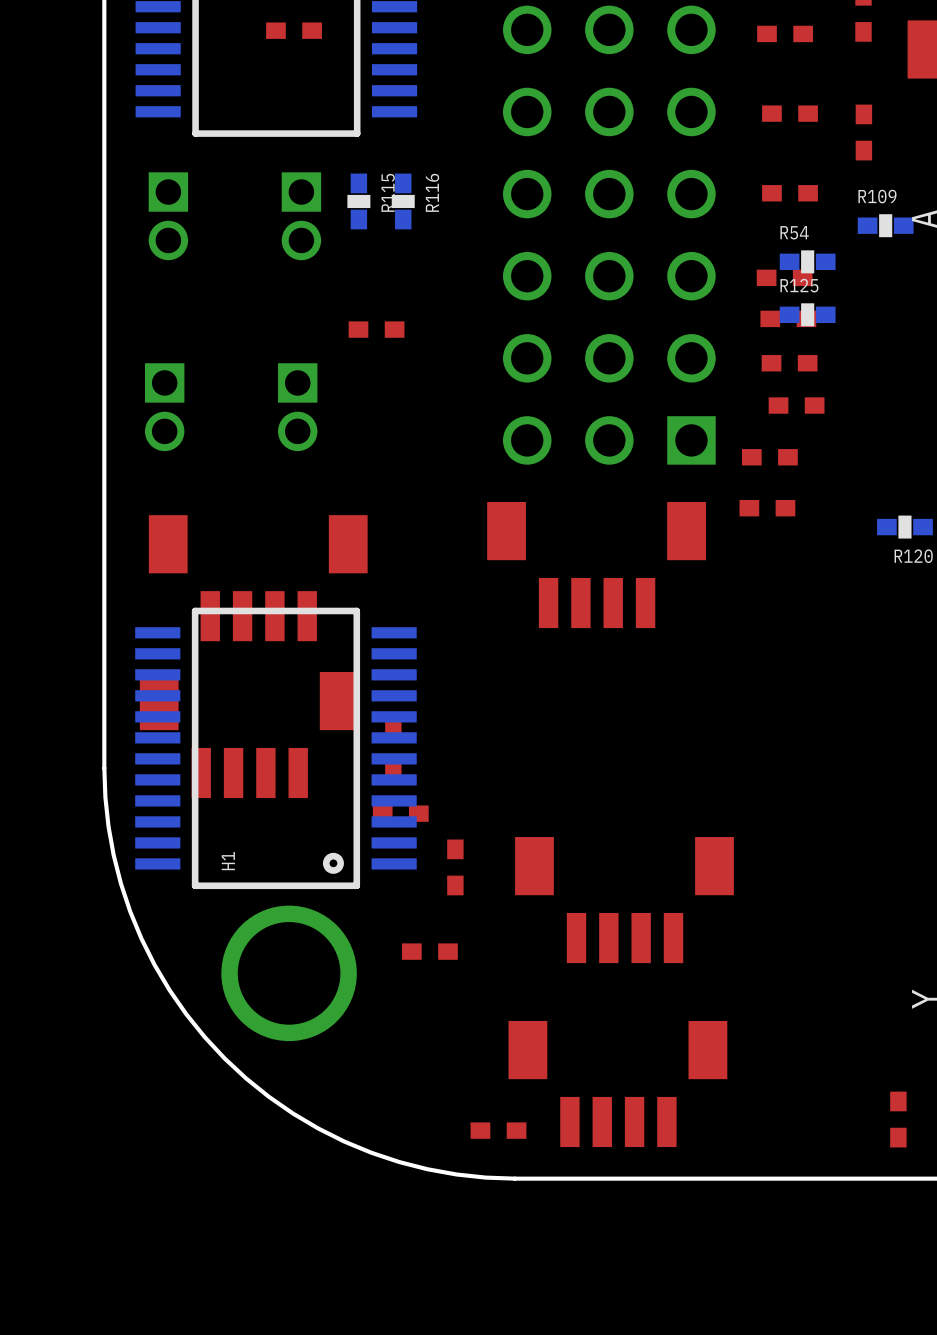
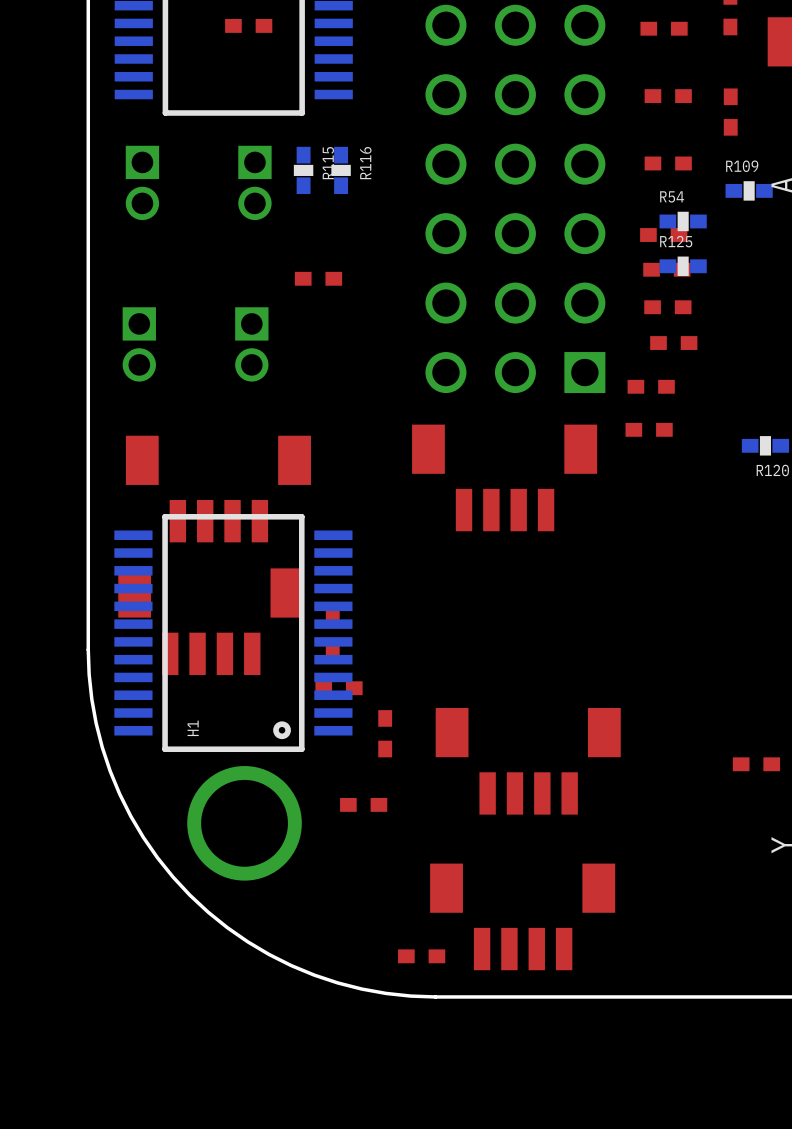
part rotation: 0° (898, 1119) -> 90° clockwise (756, 764)
part position: (898, 1119) -> (756, 764)

